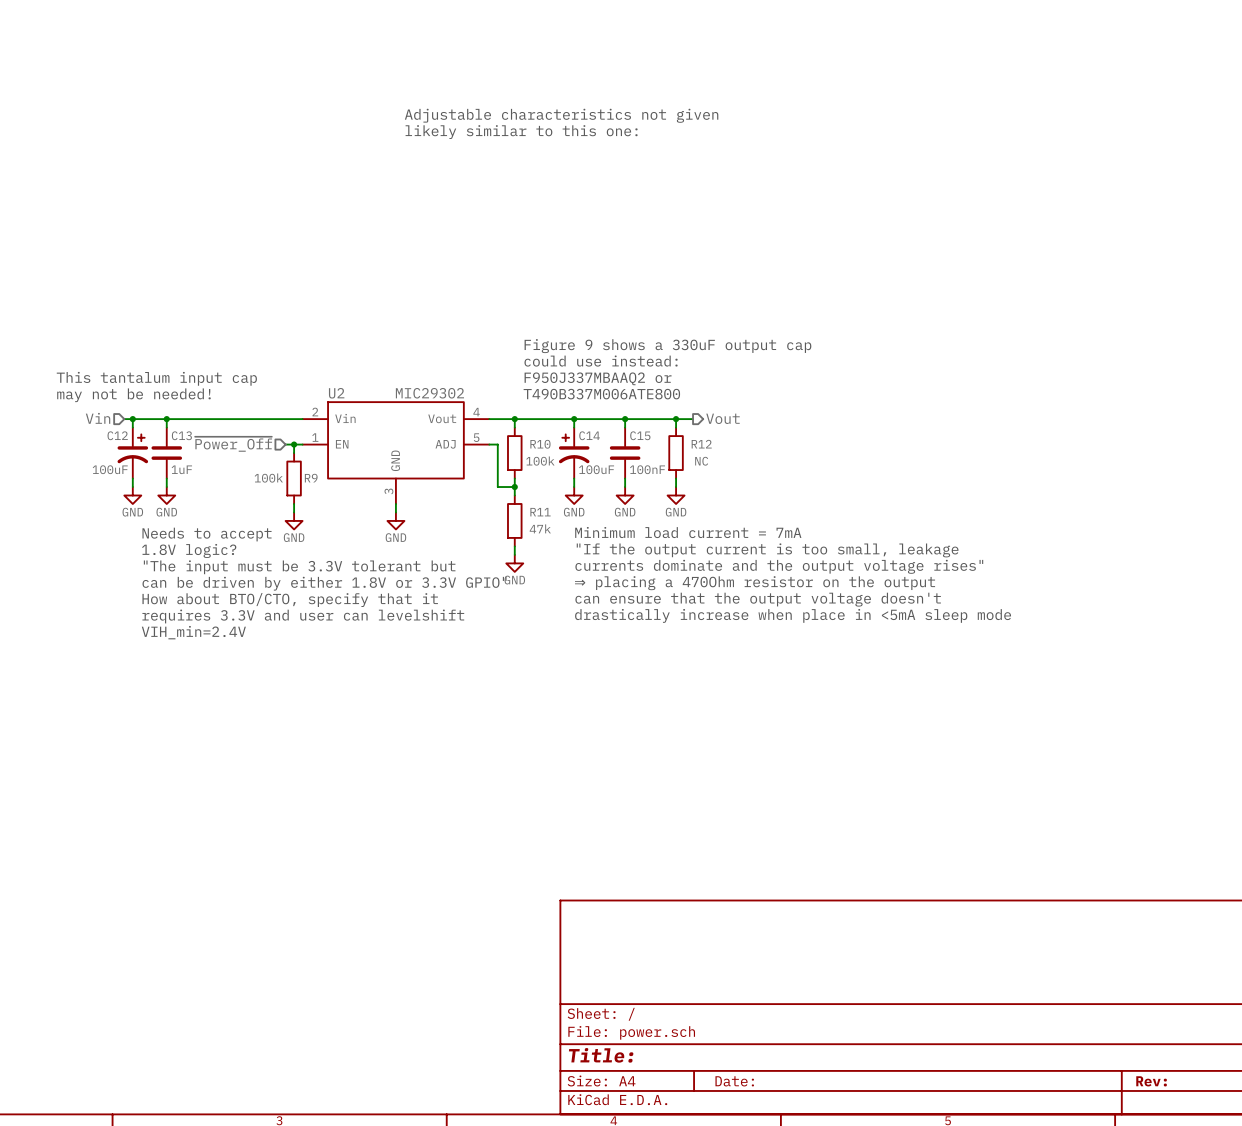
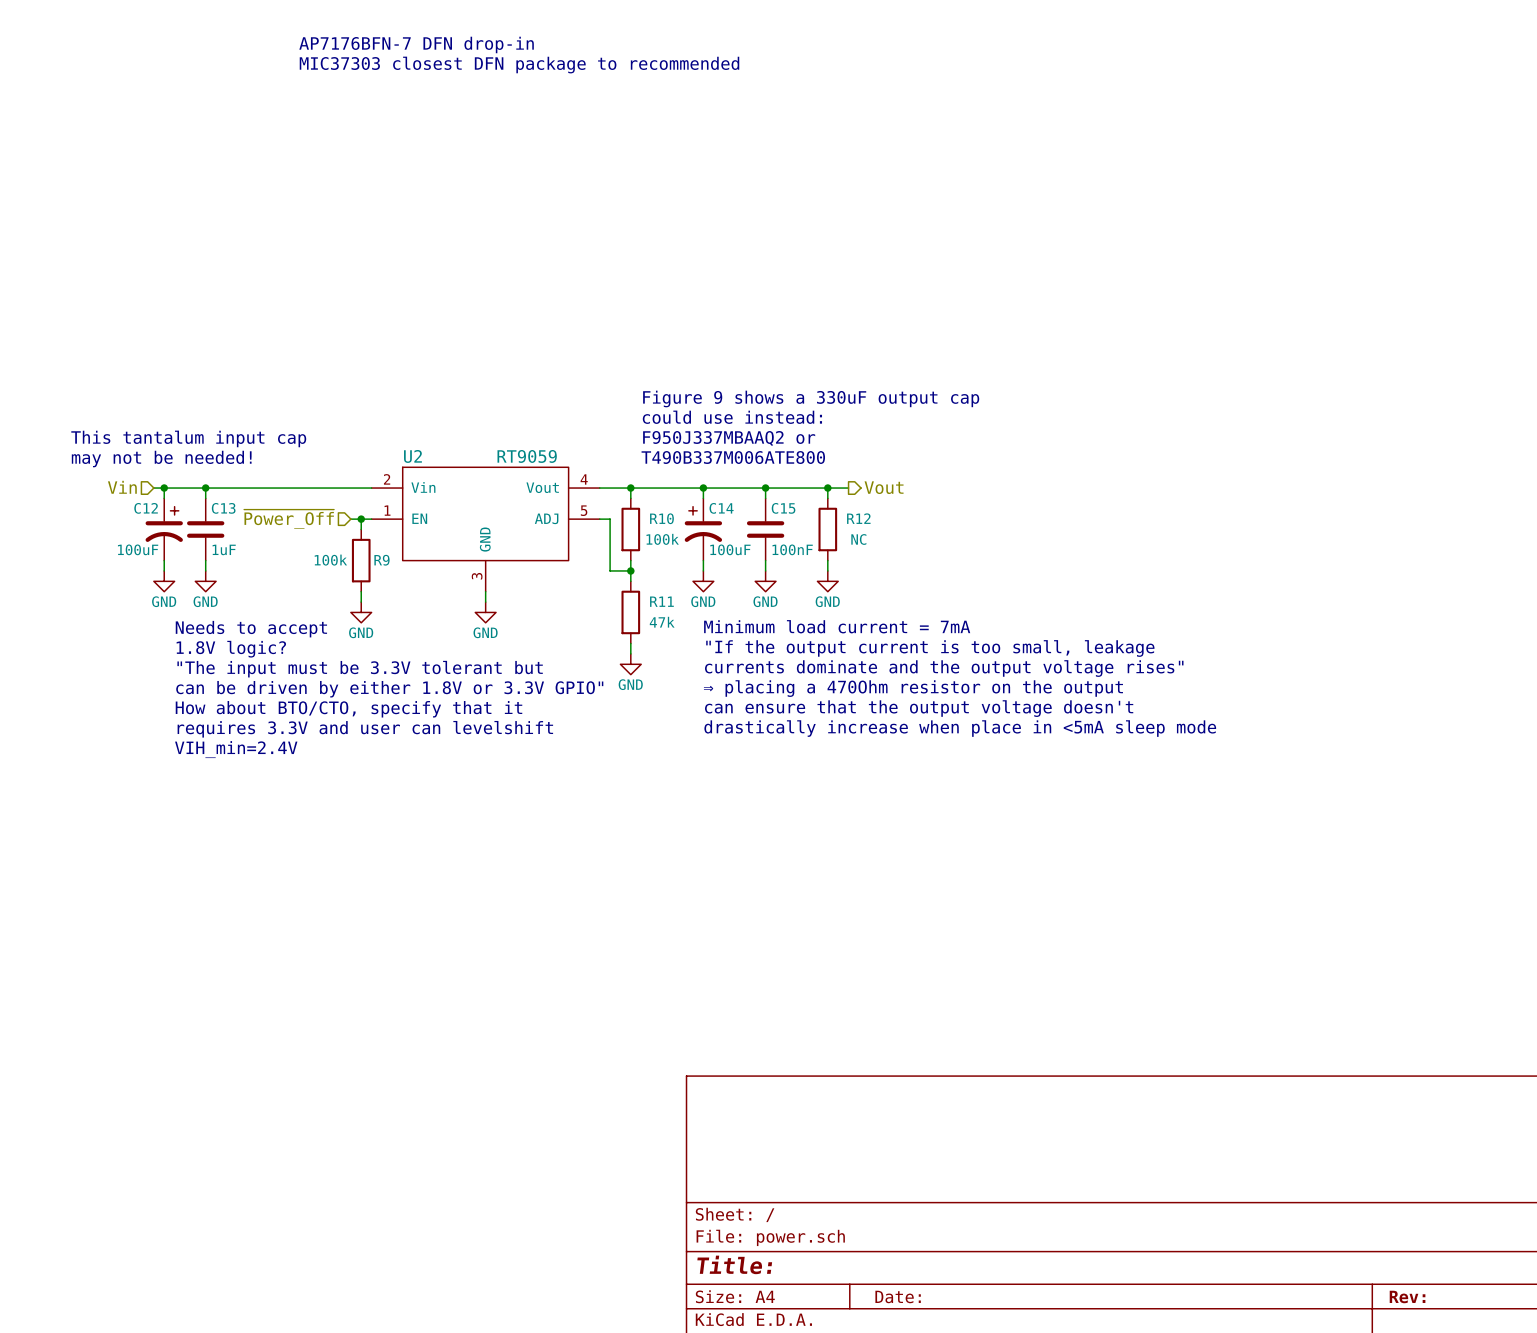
text: none -> AP7176BFN-7 DFN drop-in (416, 44)
text: none -> MIC37303 closest DFN package to recommended (519, 65)
text: Adjustable characteristics not given (561, 115) -> none
text: likely similar to this one: (521, 132) -> none
U2 value: MIC29302 (429, 393) -> RT9059 (527, 456)

